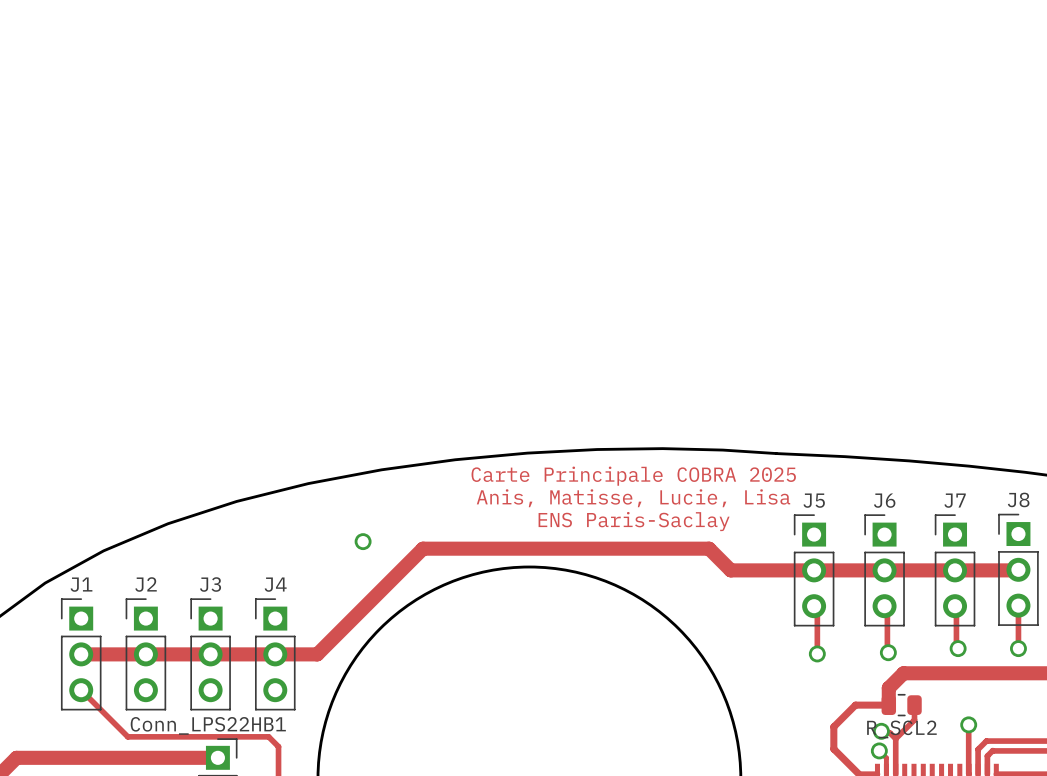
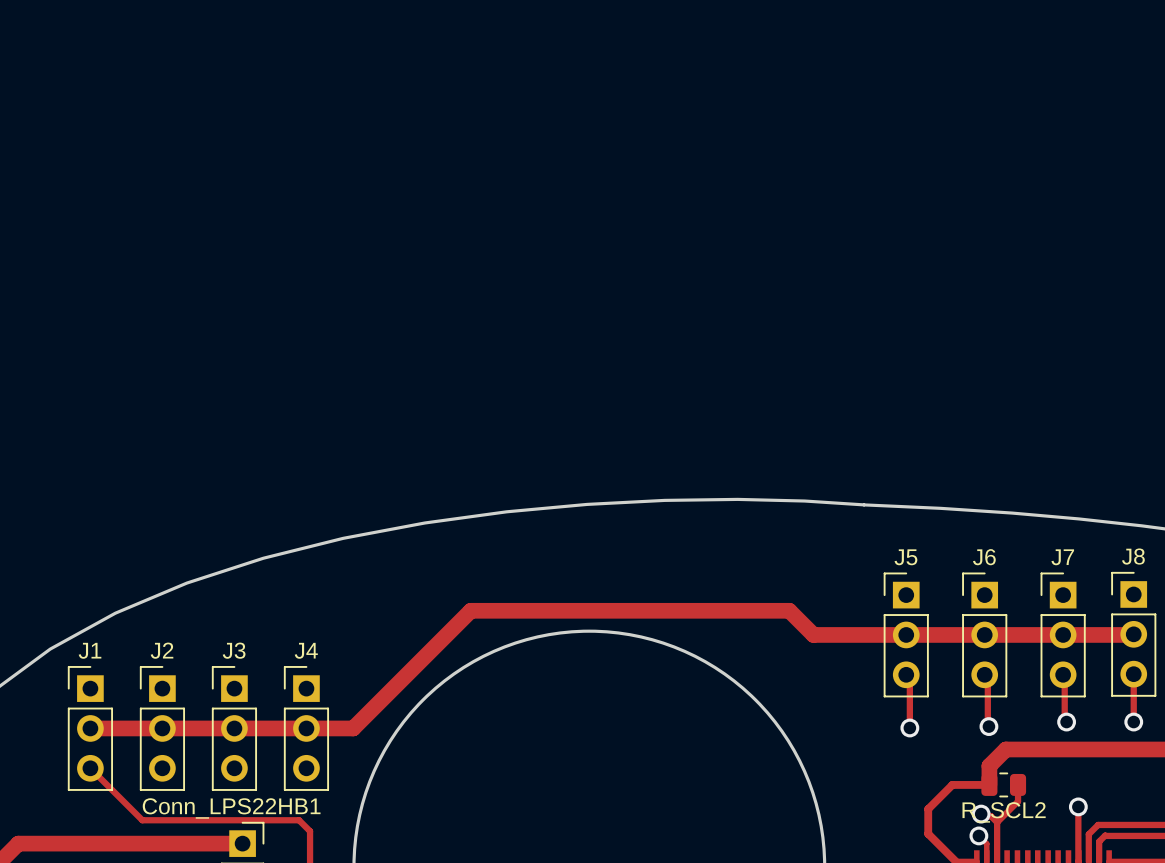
text: Carte Principale COBRA 2025 (633, 476) -> none
text: Anis, Matisse, Lucie, Lisa (633, 498) -> none
text: ENS Paris-Saclay (634, 521) -> none
via: (363, 541) -> none

